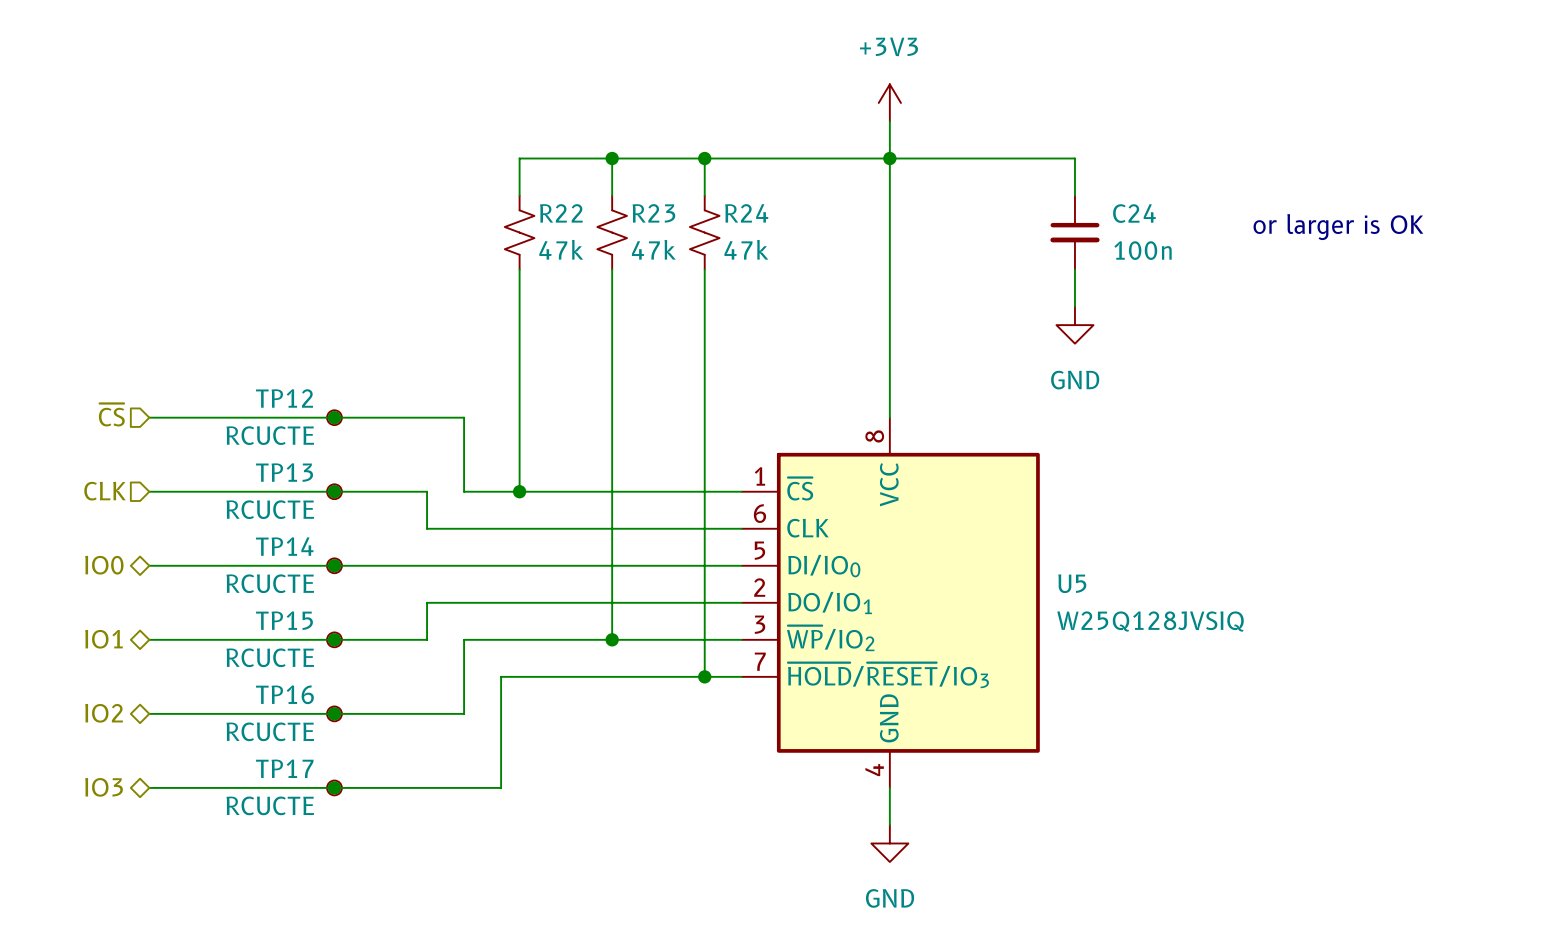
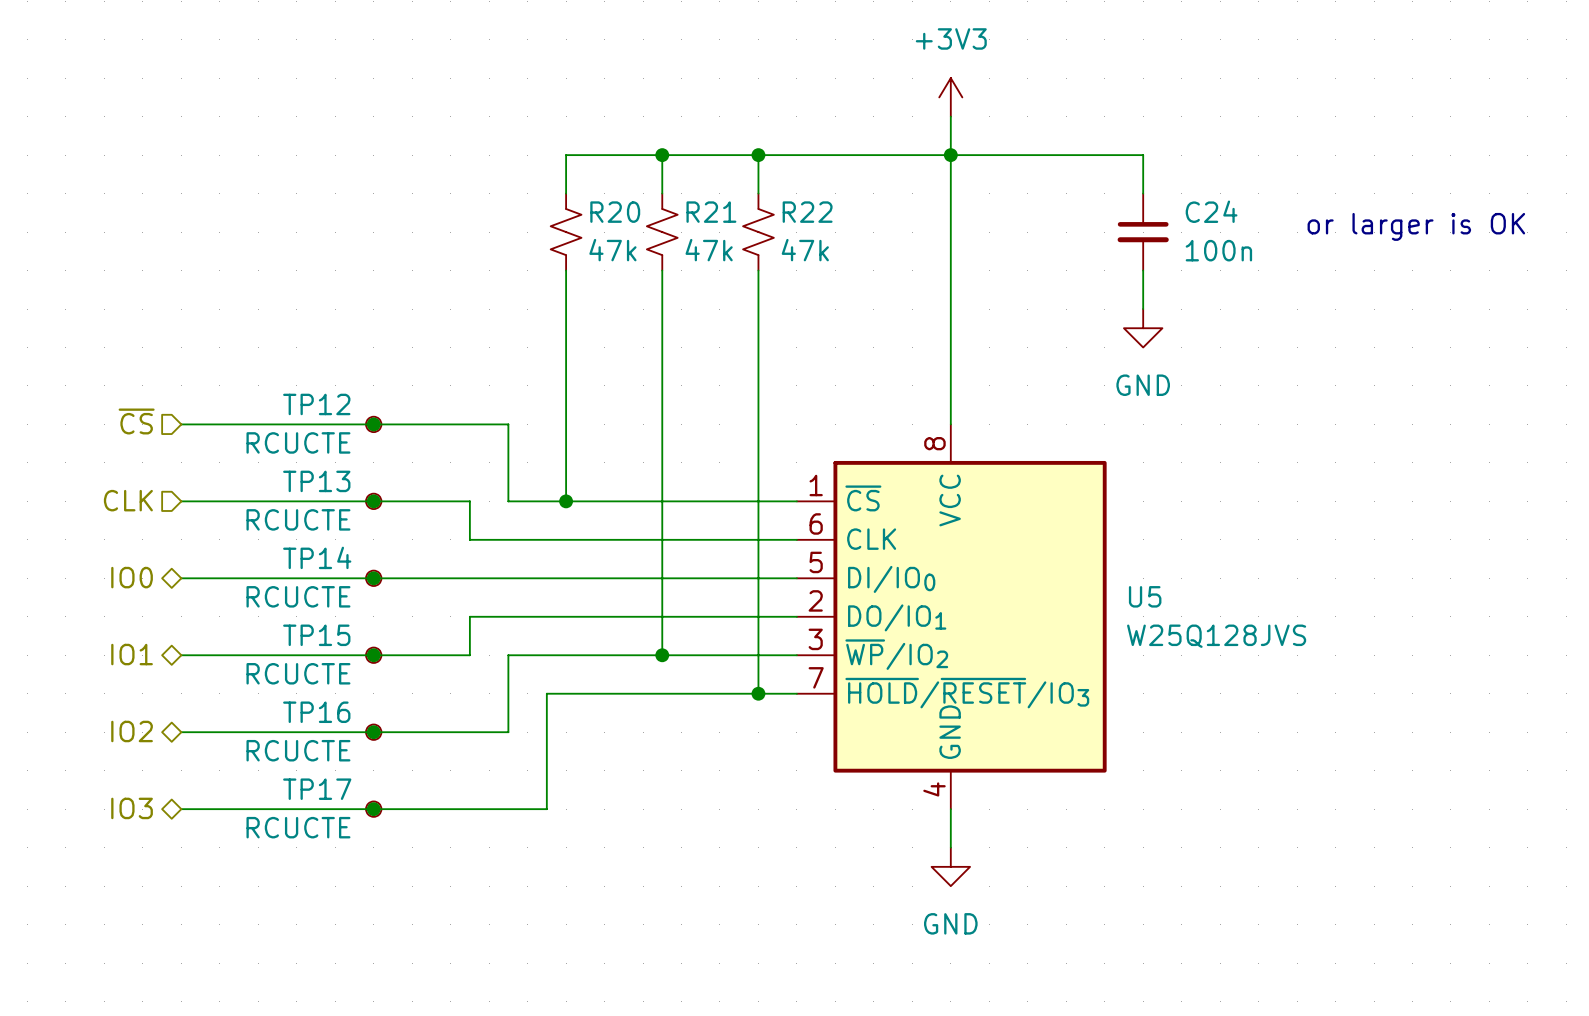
R22 name: R22 (561, 213) -> R20 (615, 212)
R23 name: R23 (653, 213) -> R21 (711, 212)
R24 name: R24 (746, 213) -> R22 (807, 212)
U5 value: W25Q128JVSIQ (1150, 621) -> W25Q128JVS (1216, 636)

